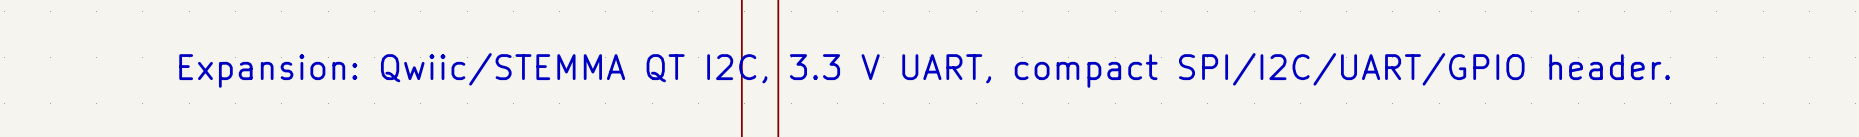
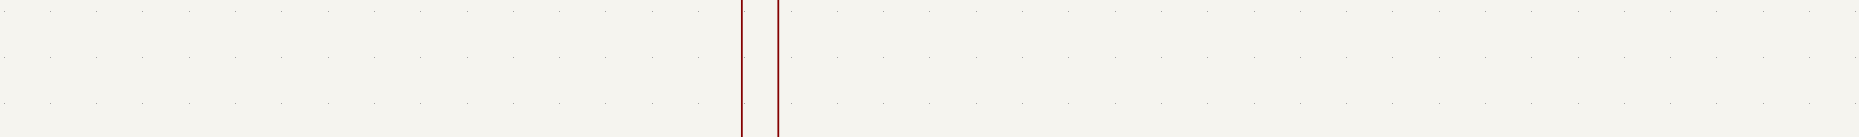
text: Expansion: Qwiic/STEMMA QT I2C, 3.3 V UART, compact SPI/I2C/UART/GPIO header. (924, 70) -> none

